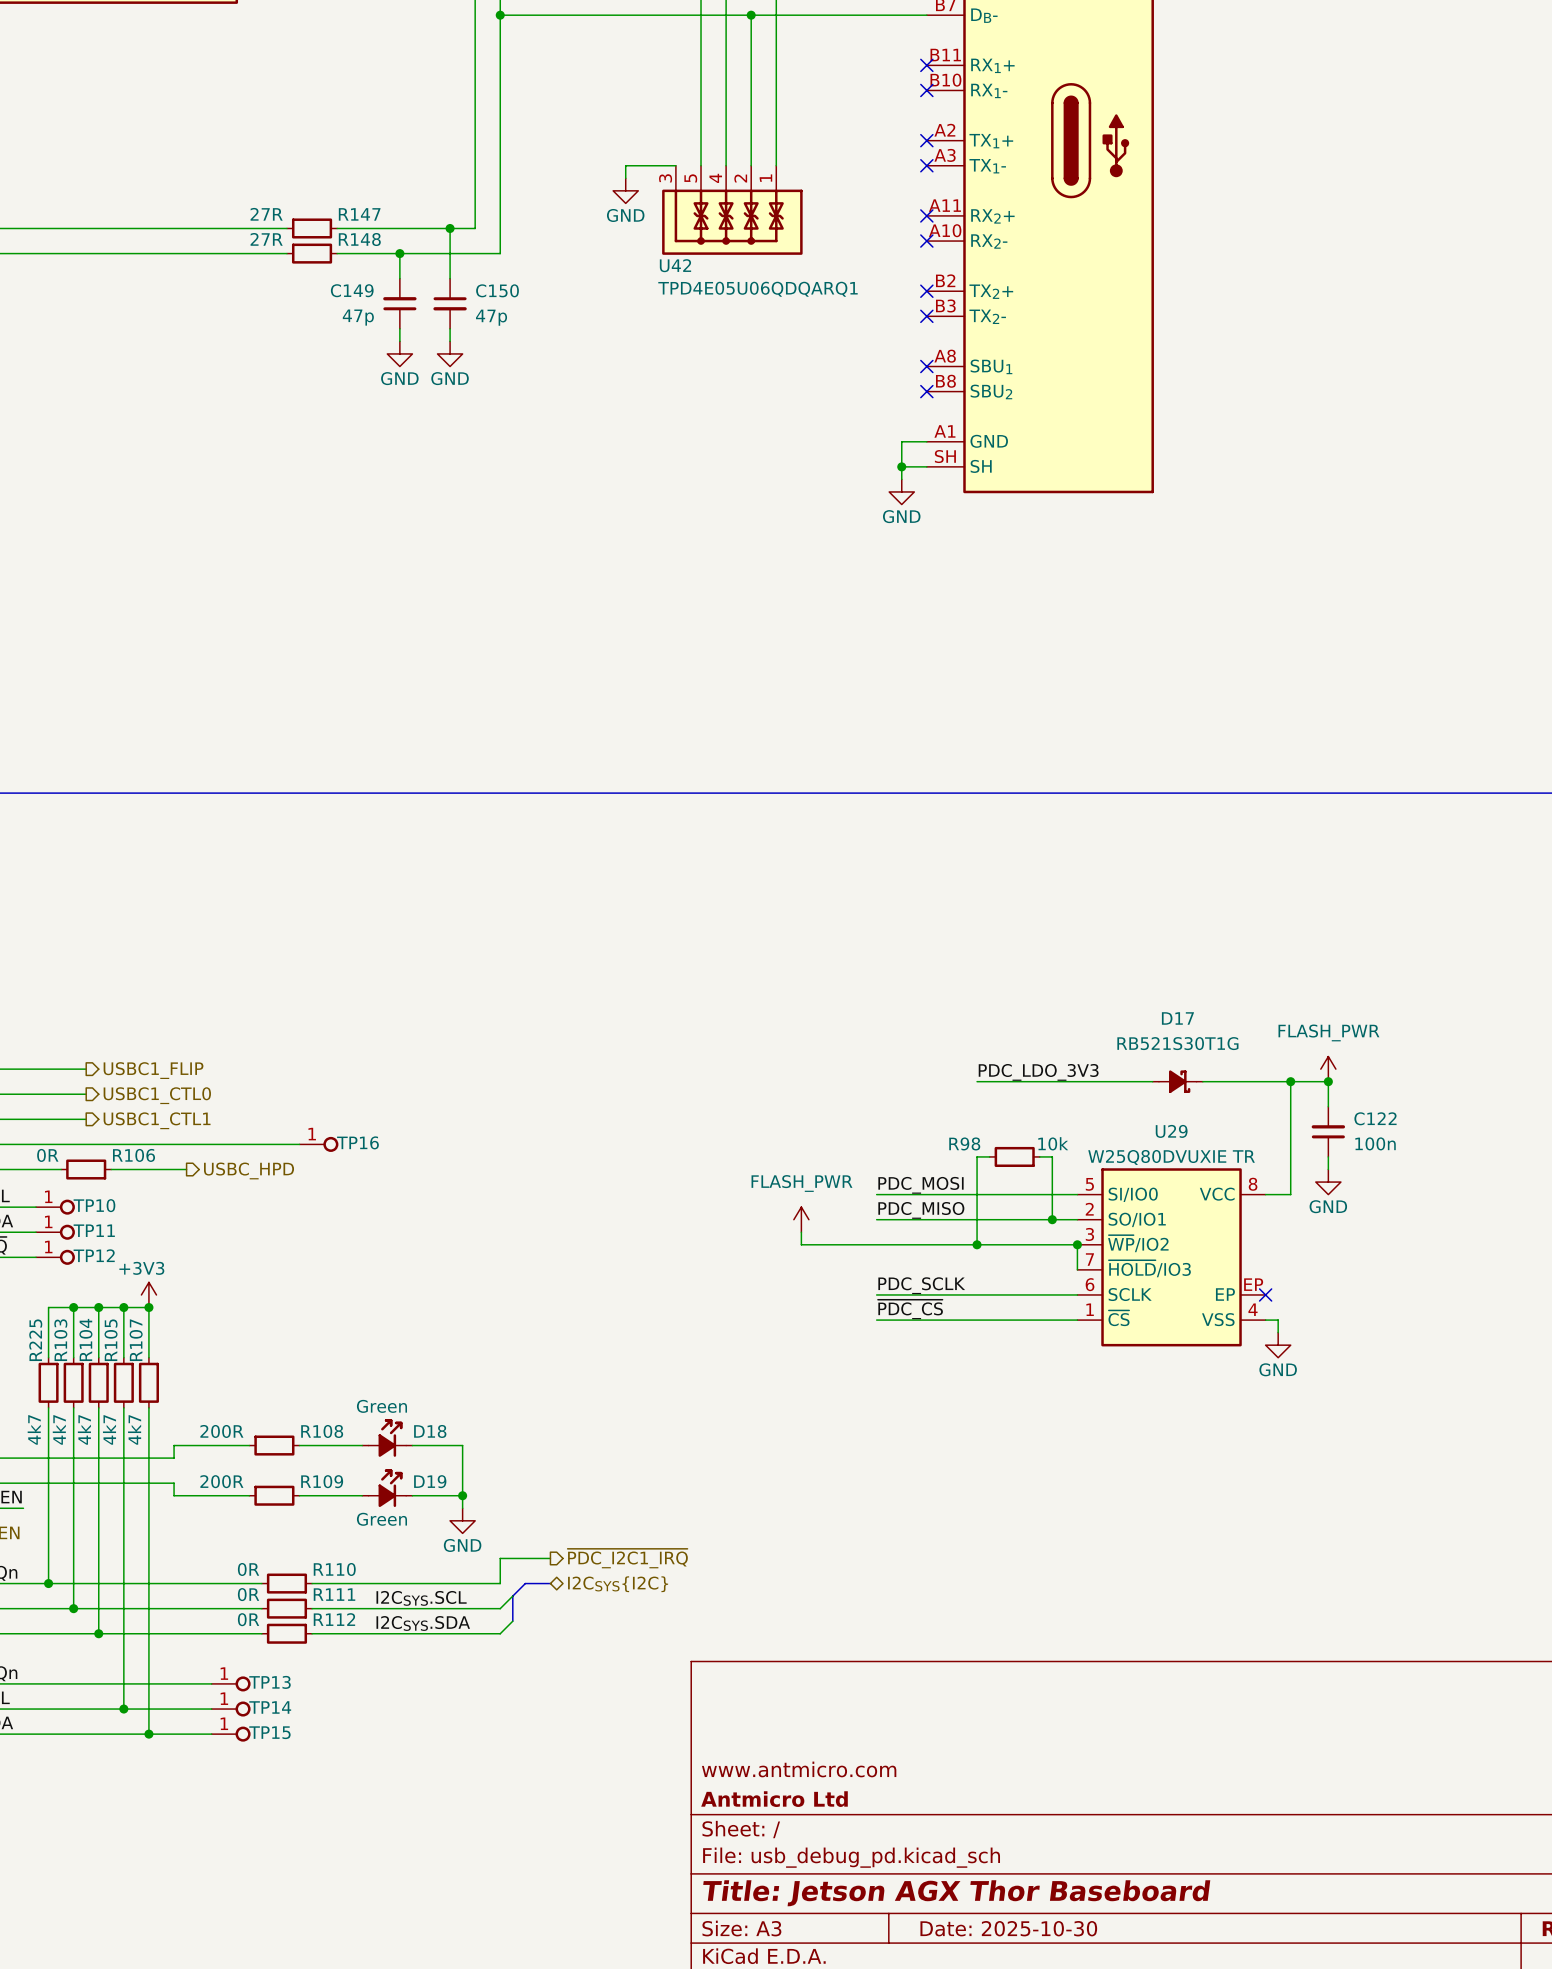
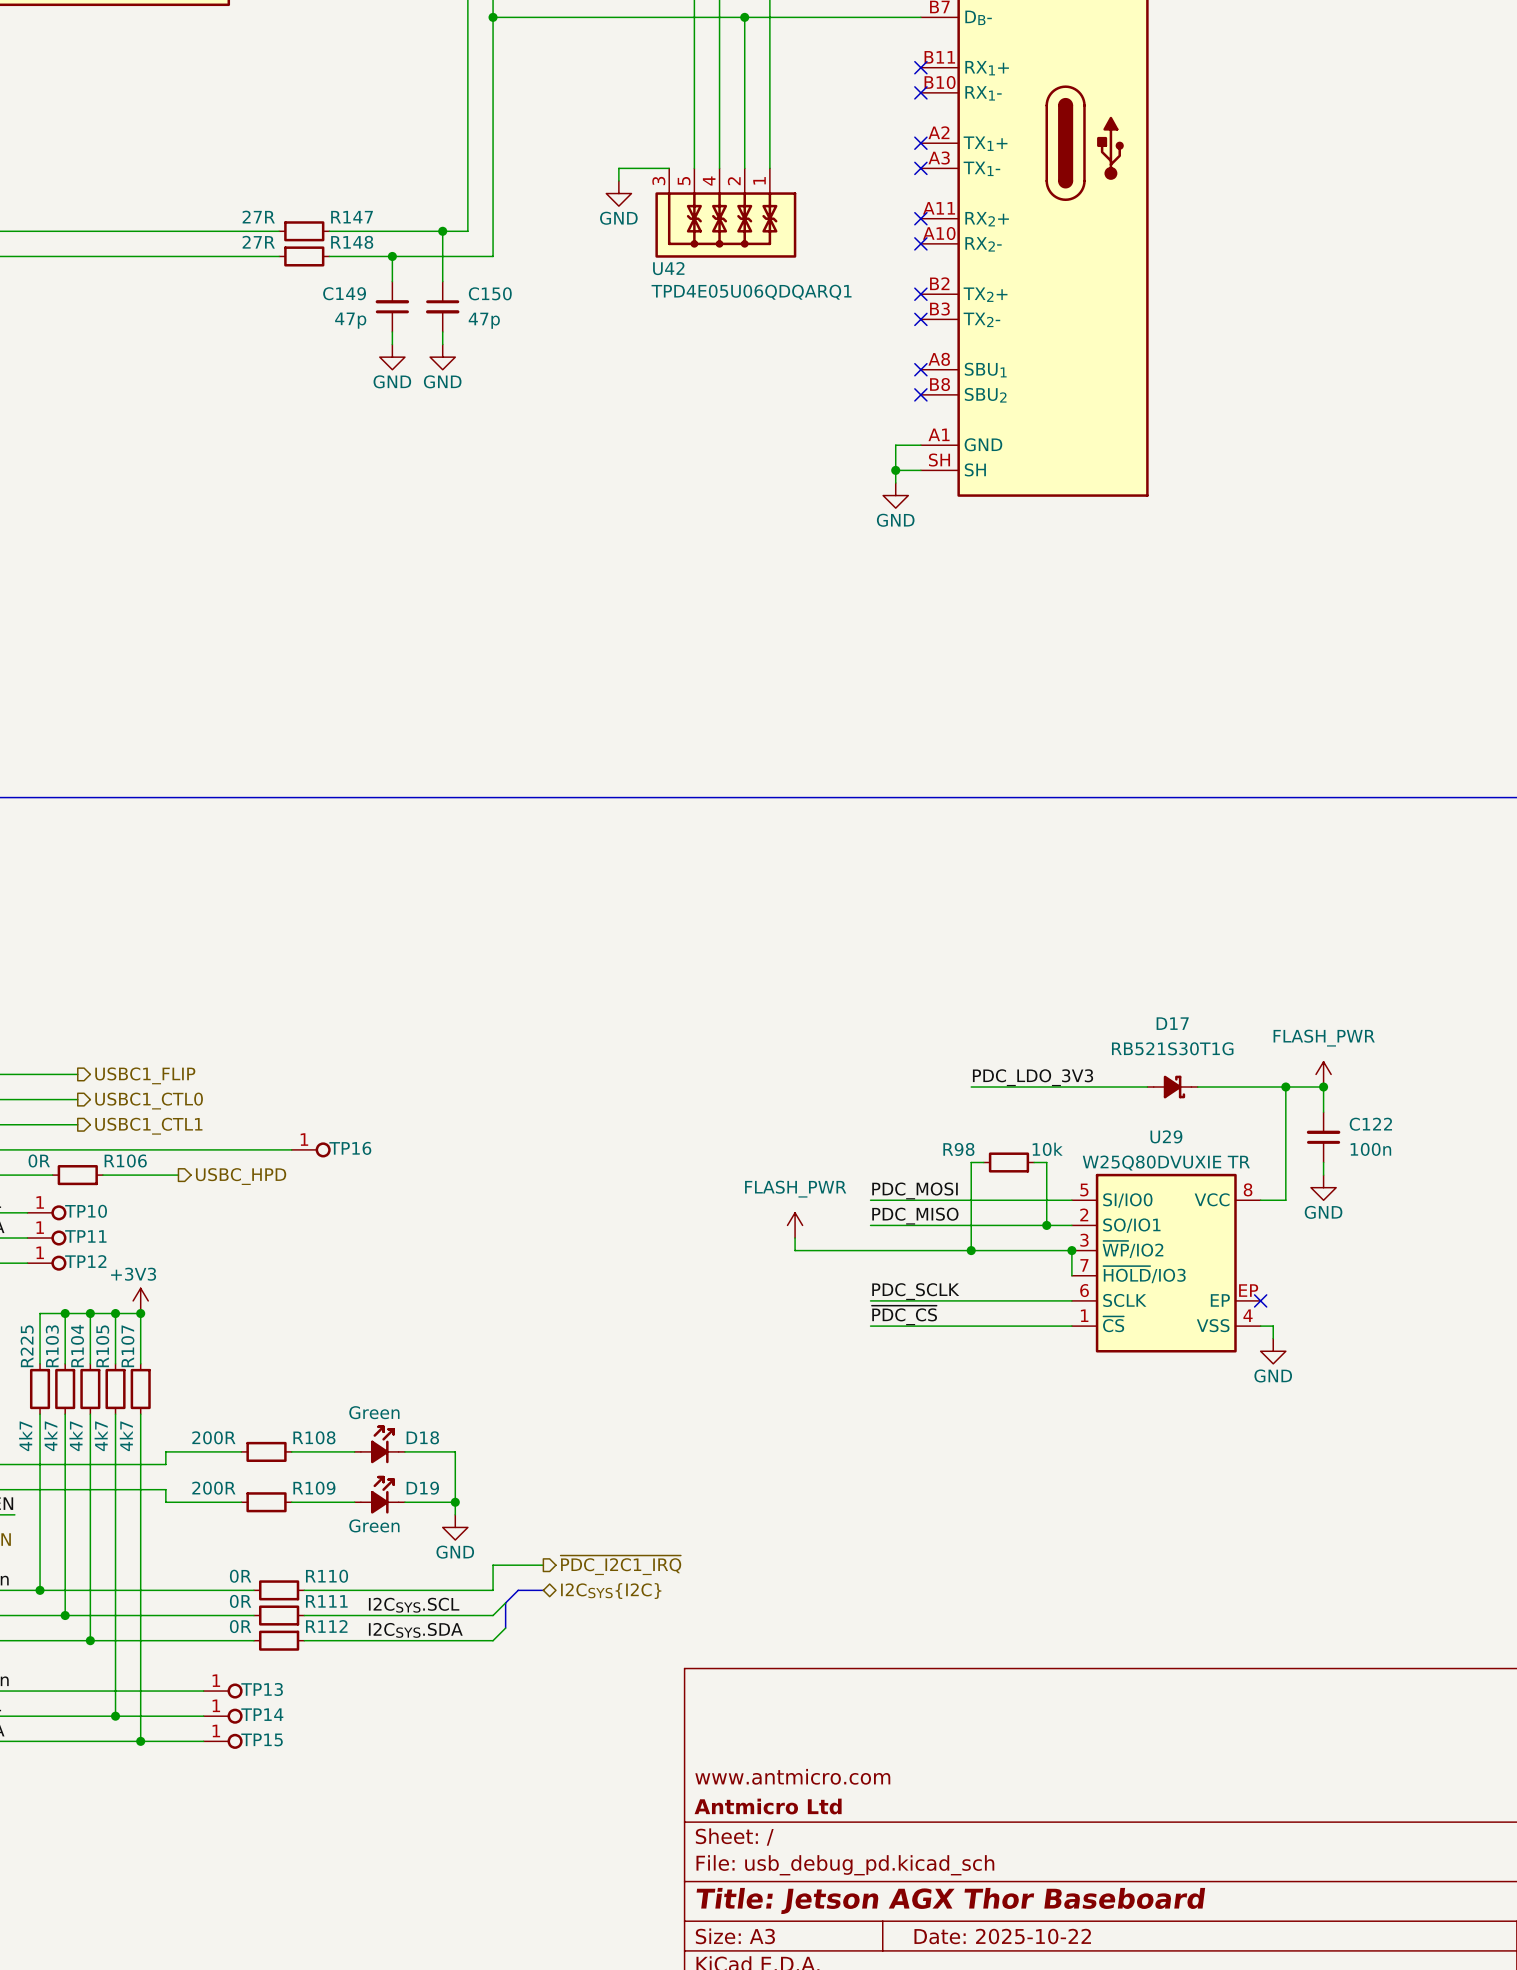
title block: Date: 2025-10-30 (1008, 1928) -> Date: 2025-10-22 (1002, 1936)

